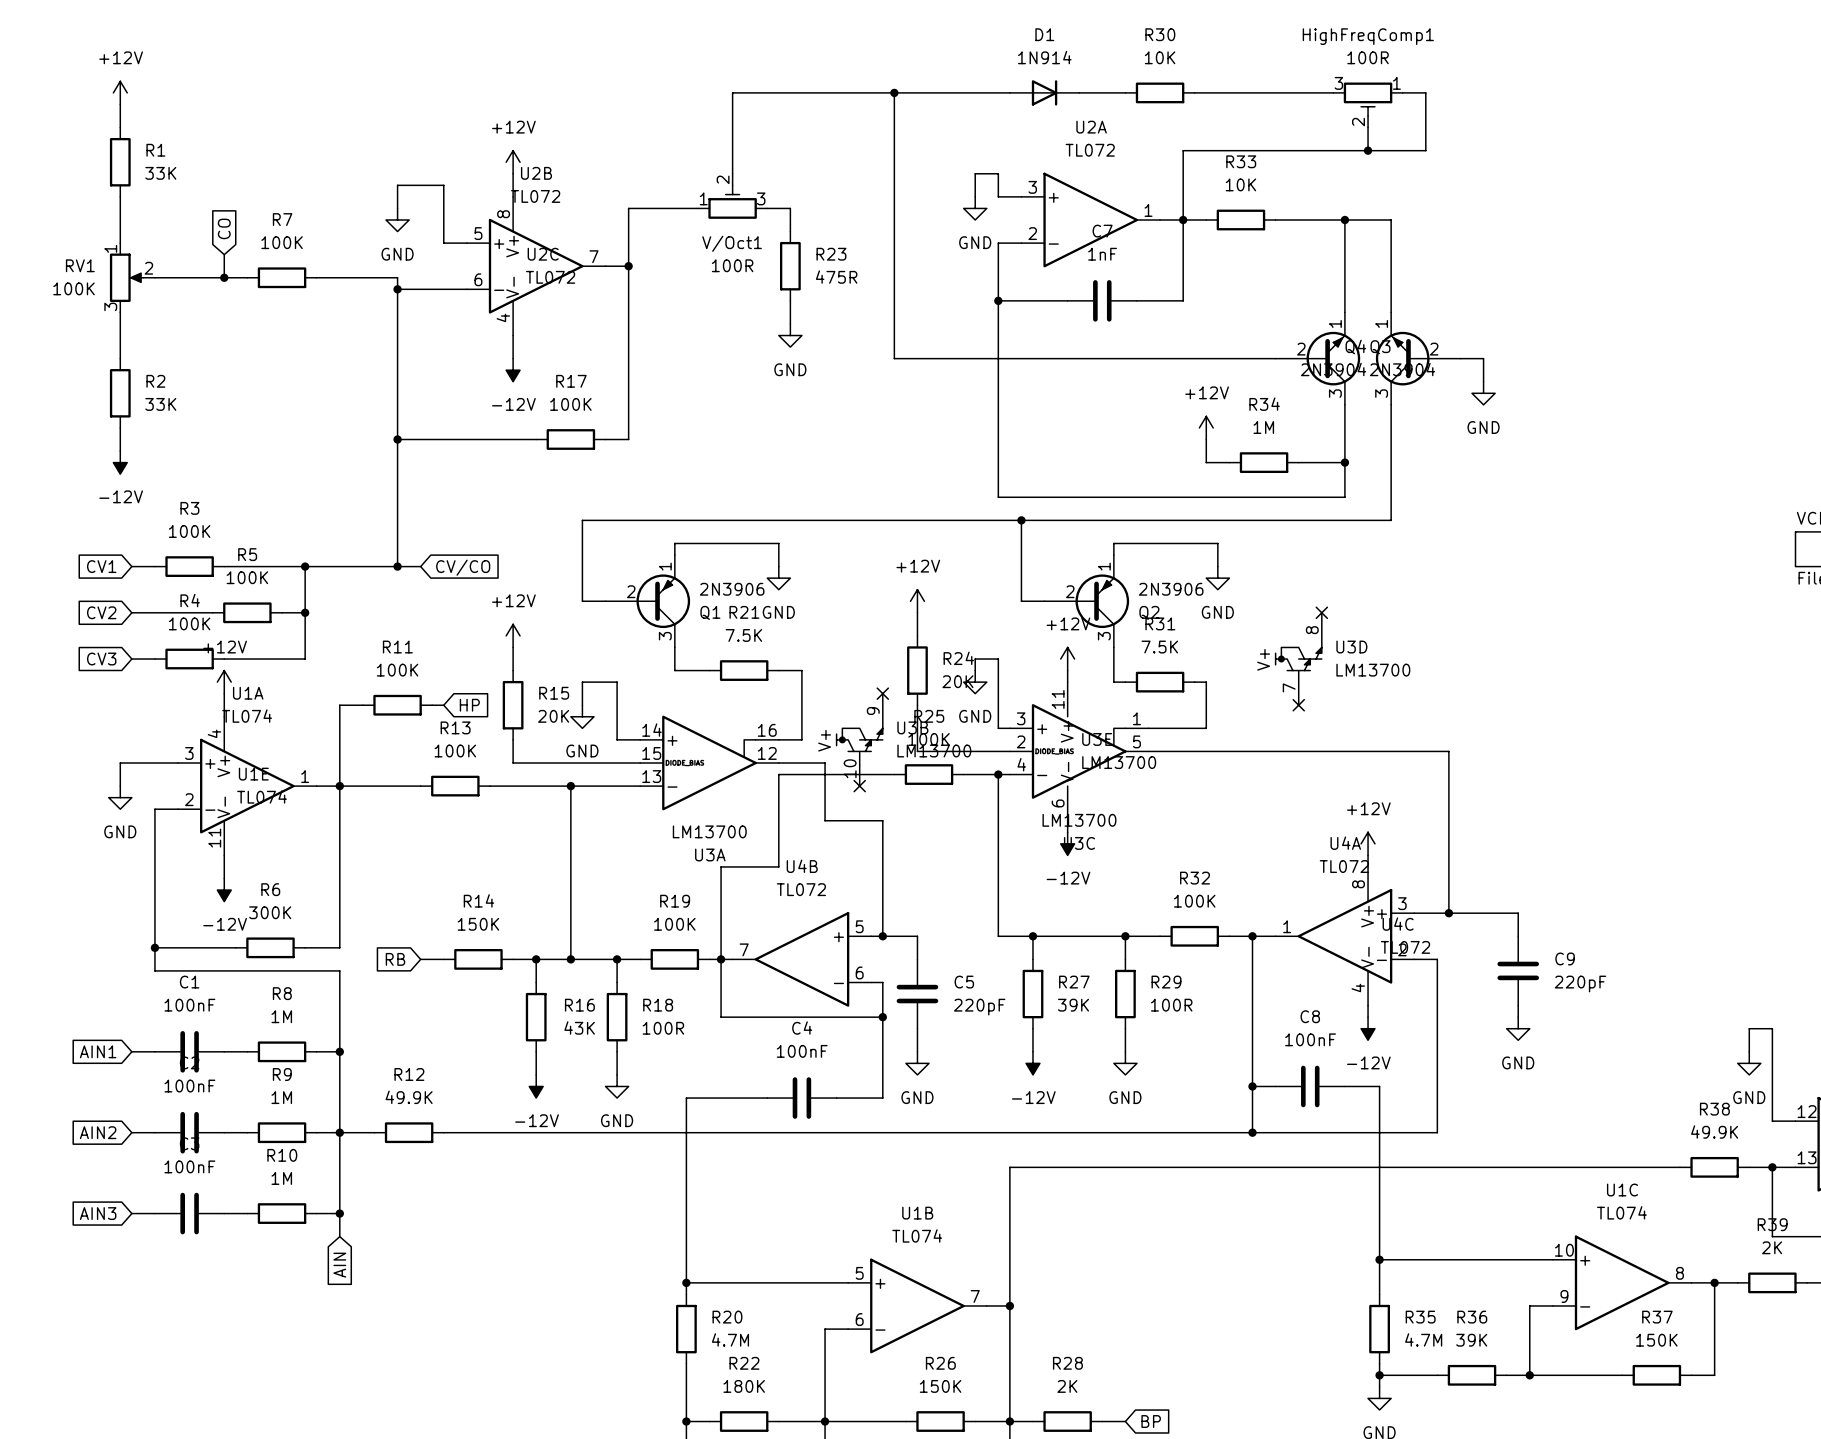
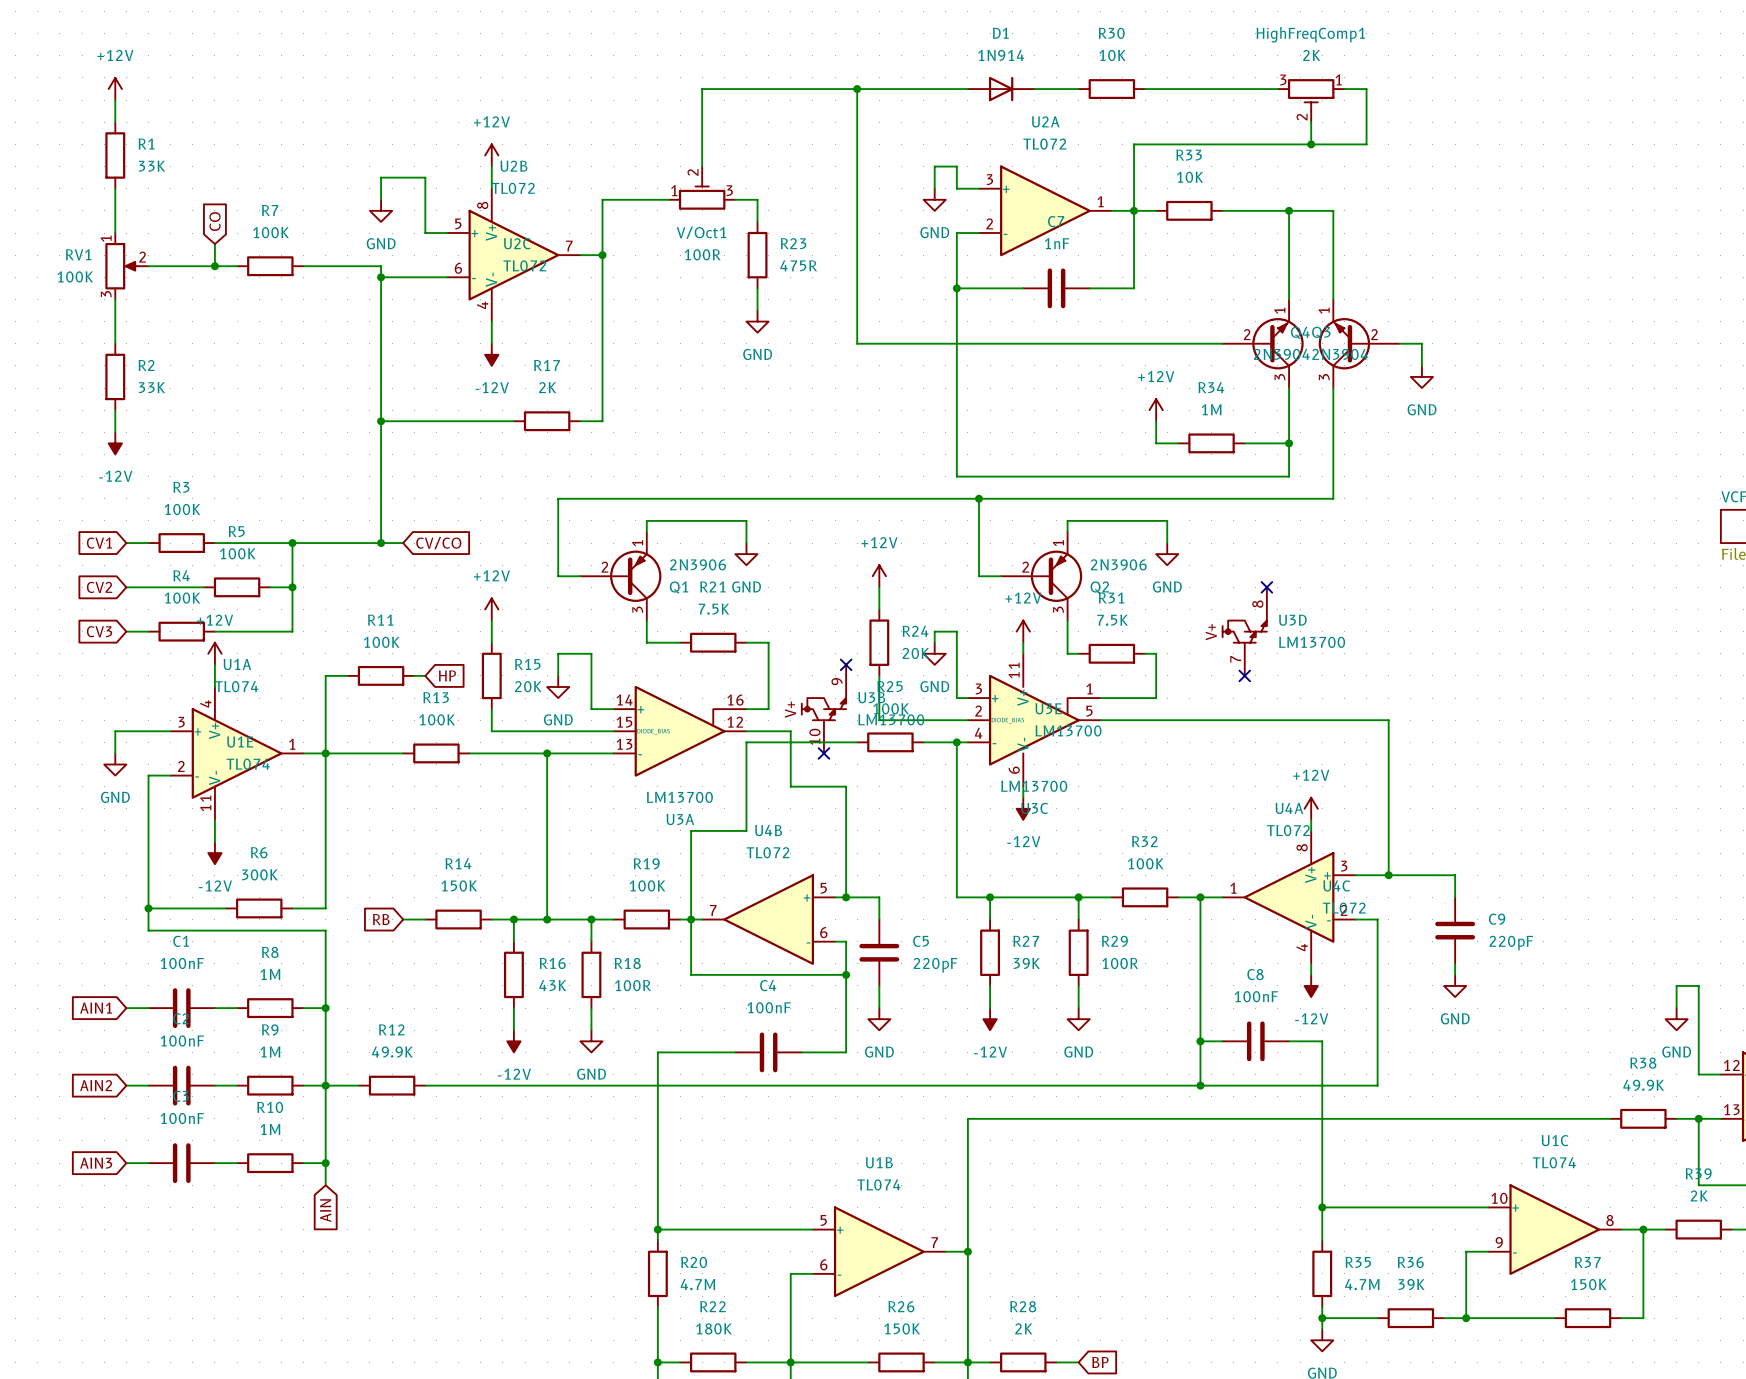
HighFreqComp1 value: 100R (1368, 57) -> 2K (1311, 55)
R17 value: 100K (570, 404) -> 2K (547, 387)

